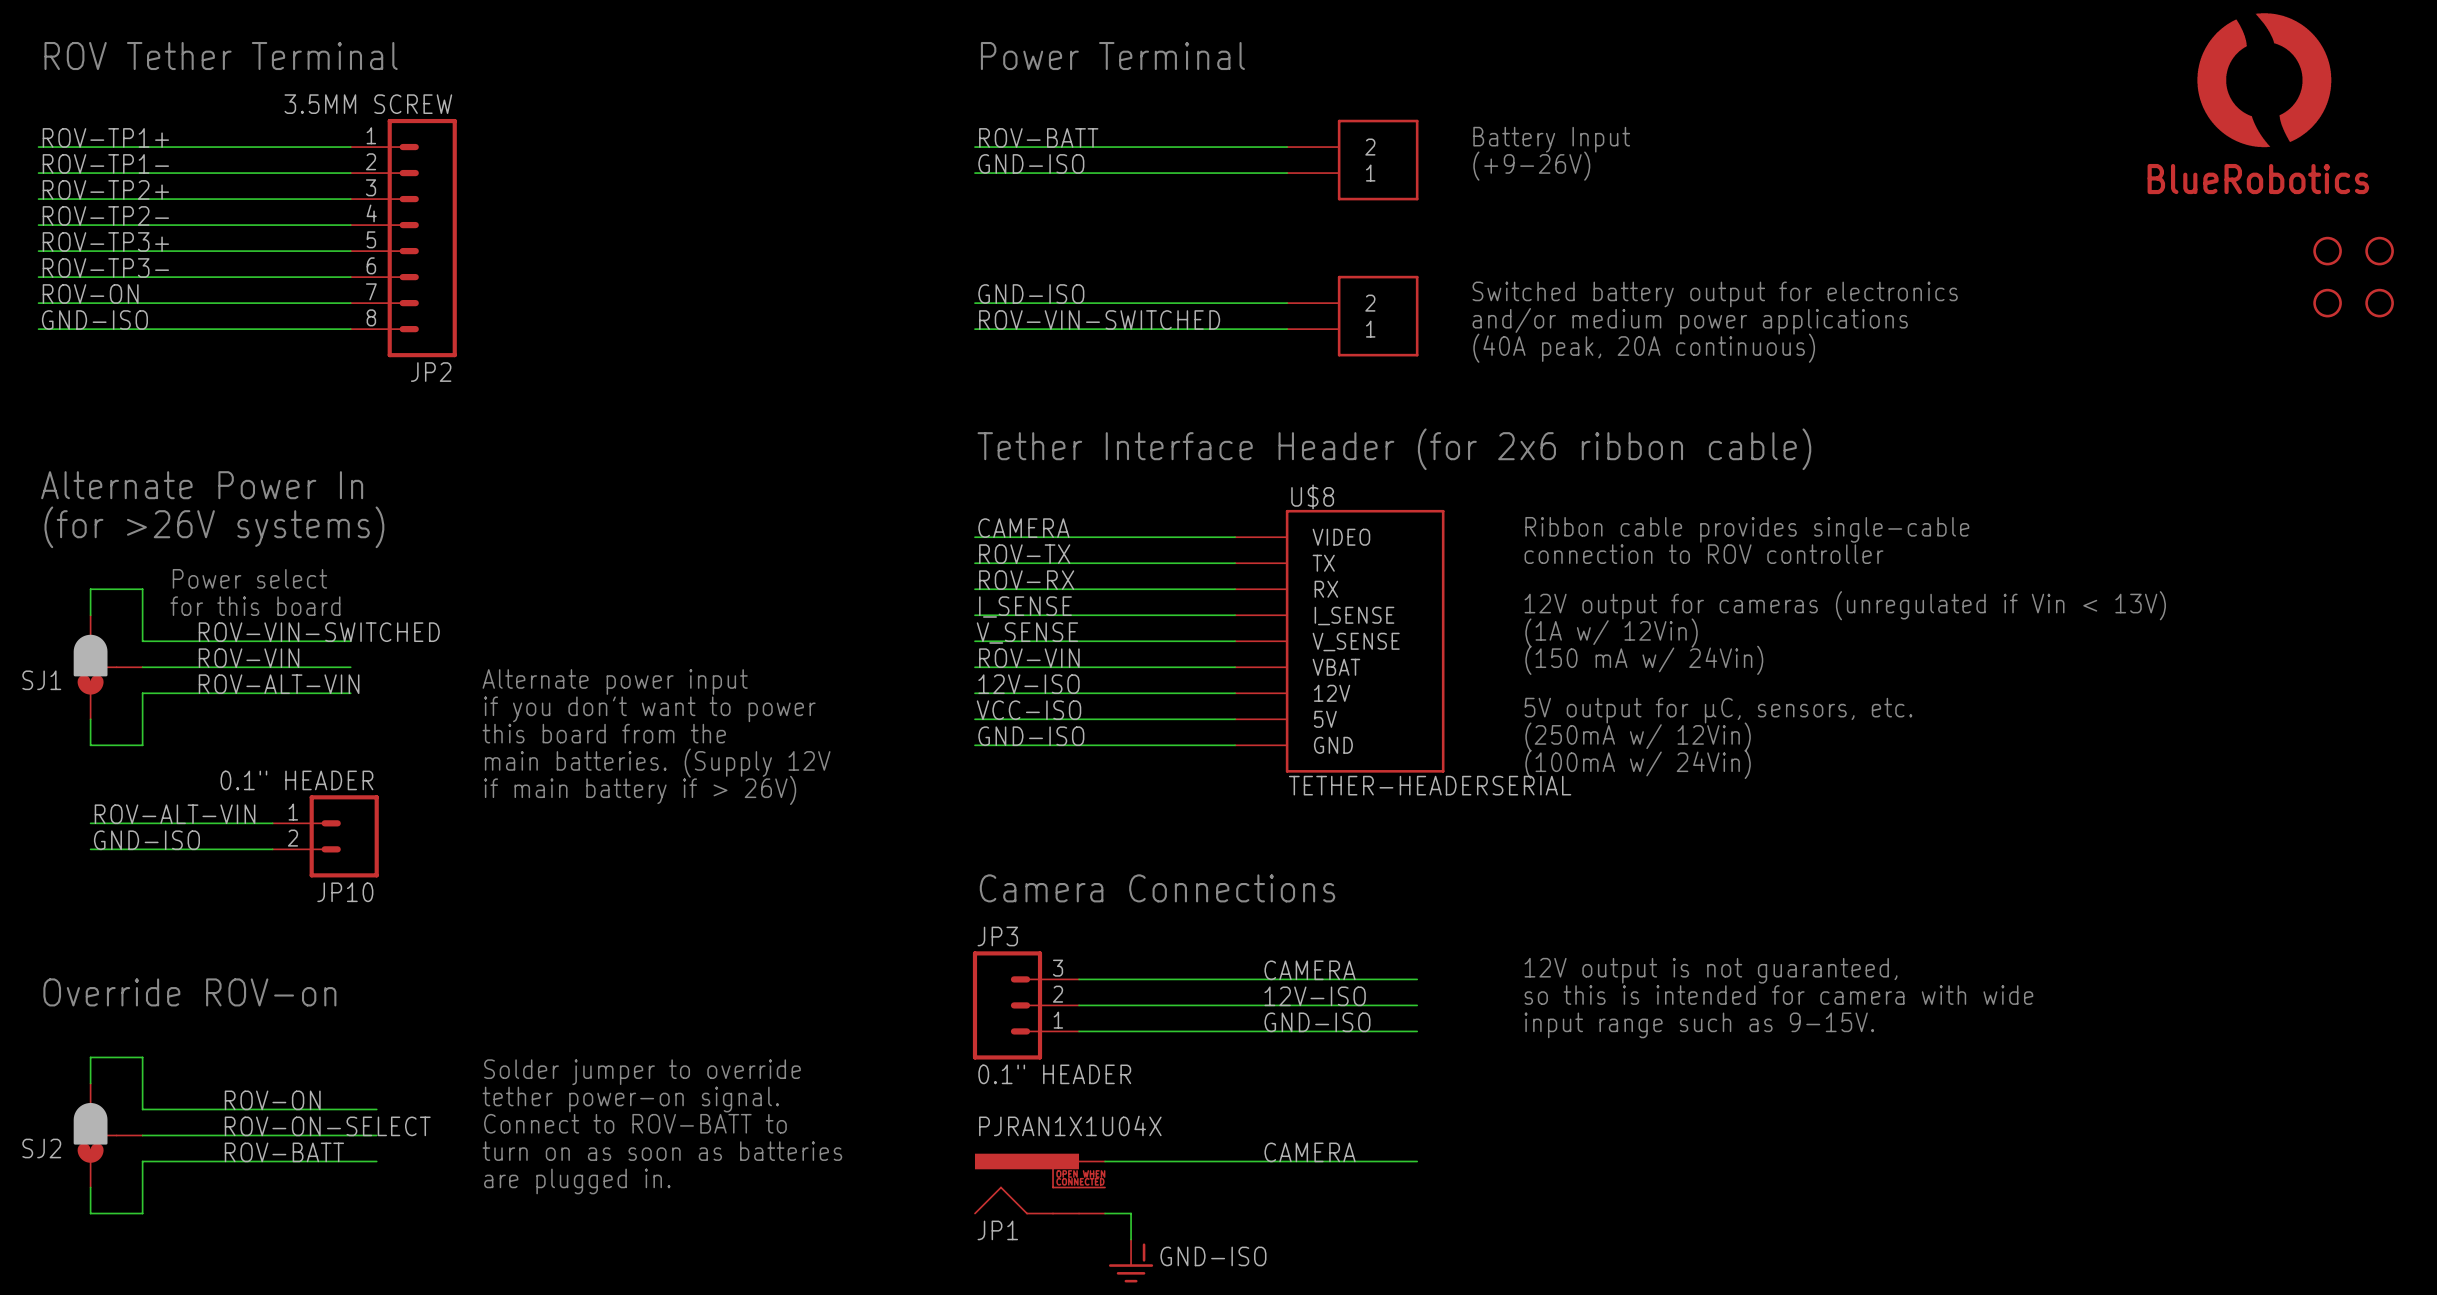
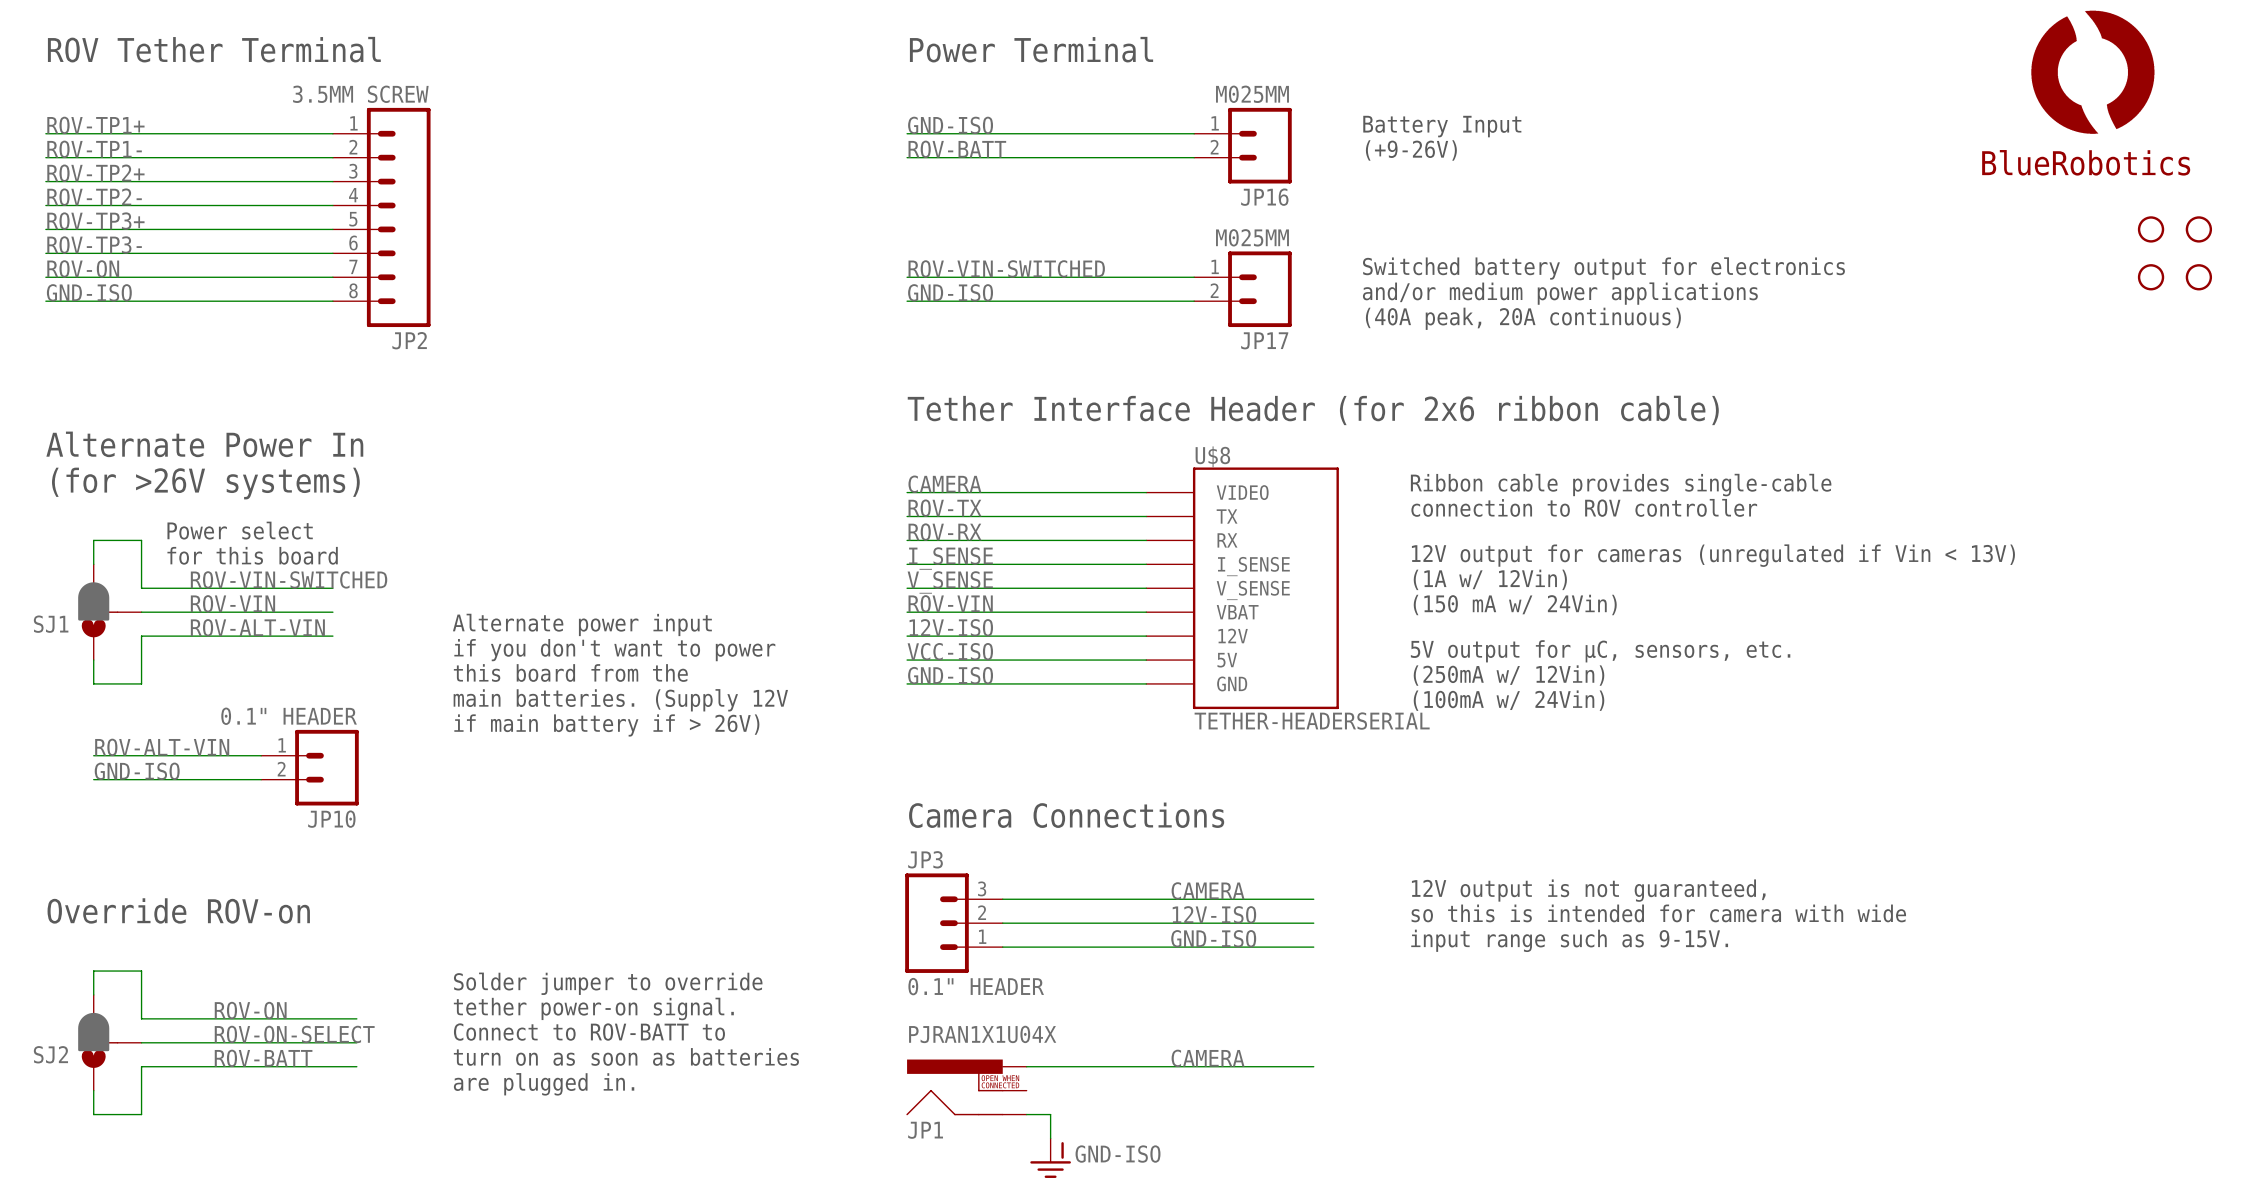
label: ROV-BATT (1038, 137) -> GND-ISO (950, 125)
JP16: none -> M025MM (1242, 145)
part: (1352, 160) -> none
label: GND-ISO (1031, 163) -> ROV-BATT (957, 149)
label: GND-ISO (1031, 294) -> ROV-VIN-SWITCHED (1006, 268)
JP17: none -> M025MM (1242, 289)
part: (1352, 316) -> none
label: ROV-VIN-SWITCHED (1099, 320) -> GND-ISO (950, 292)

